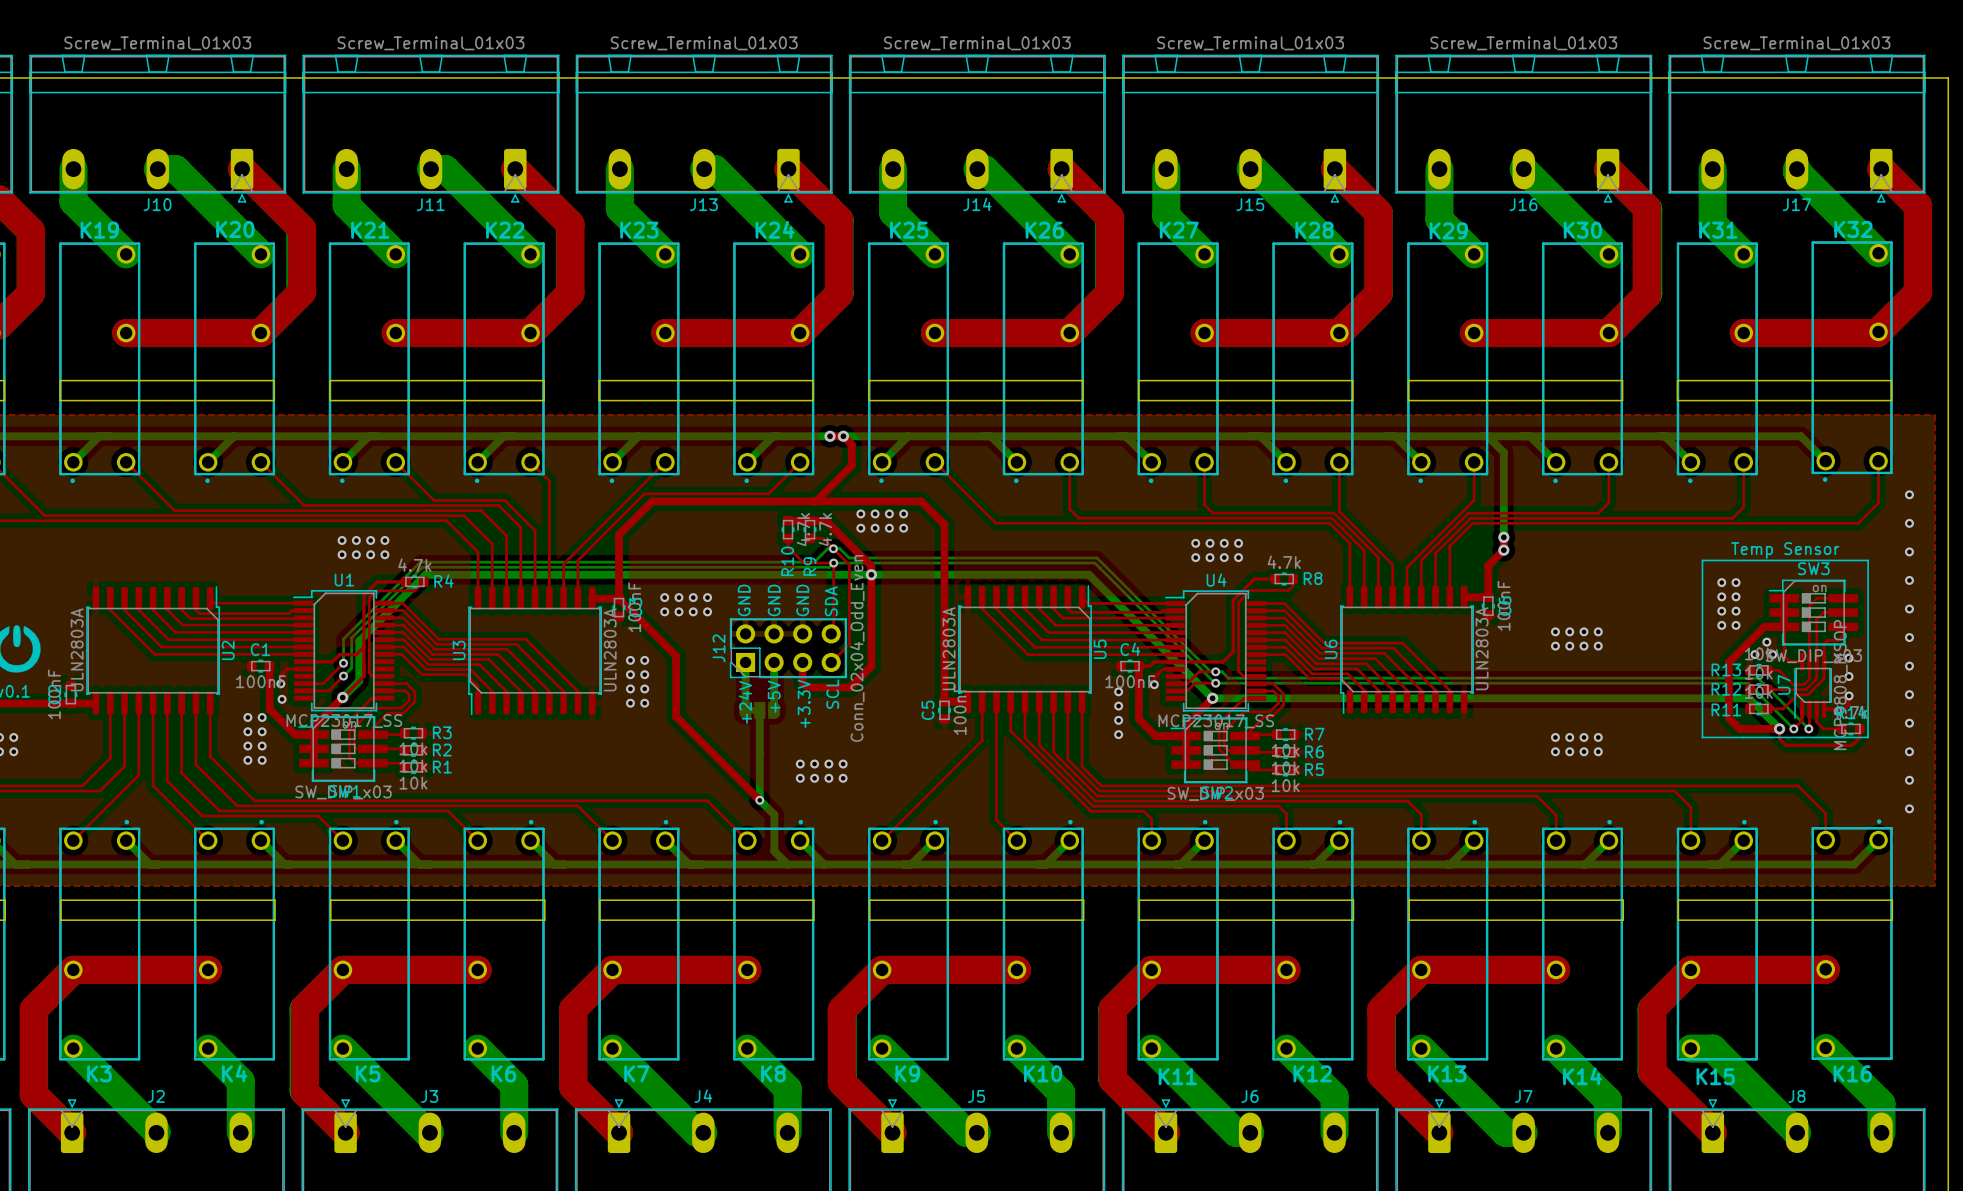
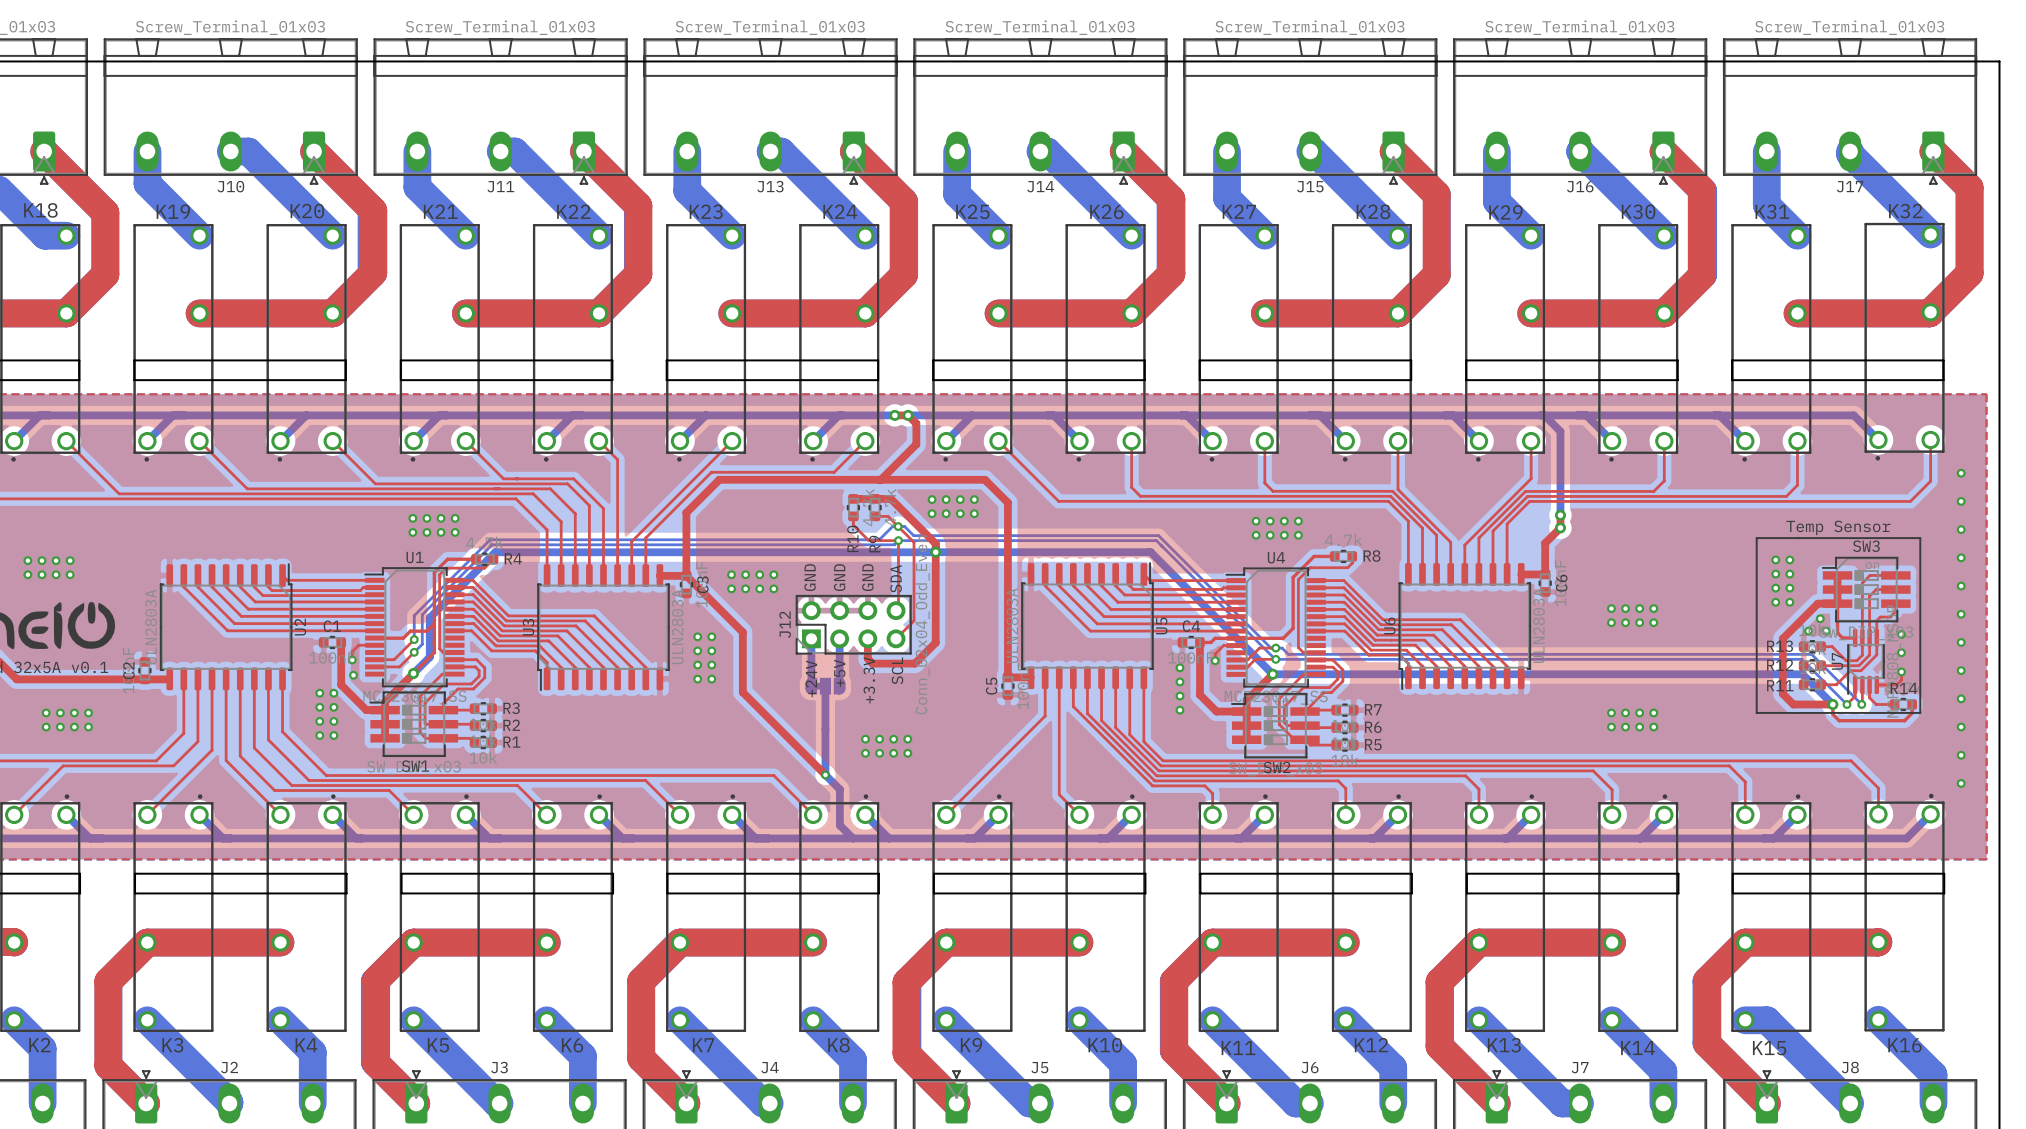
via: (860, 513) -> none
via: (875, 513) -> none
via: (889, 513) -> none
via: (903, 513) -> none
via: none -> (932, 499)
via: none -> (946, 499)
via: none -> (960, 499)
via: none -> (974, 499)
via: (860, 528) -> none
via: (875, 528) -> none
via: (889, 528) -> none
via: (903, 528) -> none
via: none -> (932, 513)
via: none -> (946, 513)
via: none -> (960, 513)
via: none -> (974, 513)

